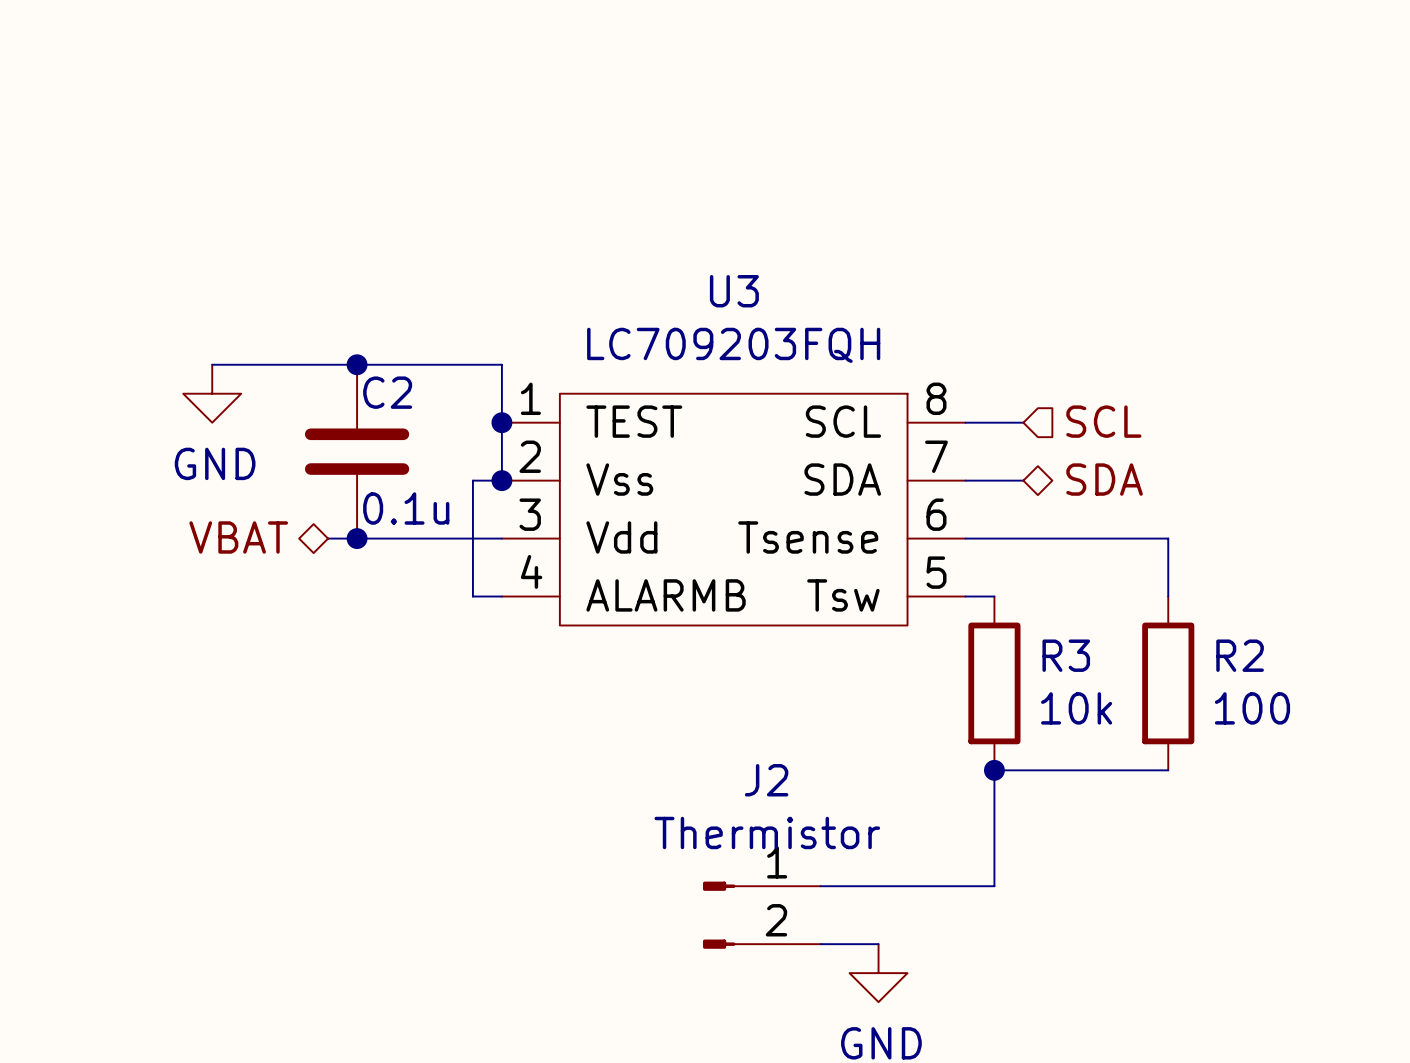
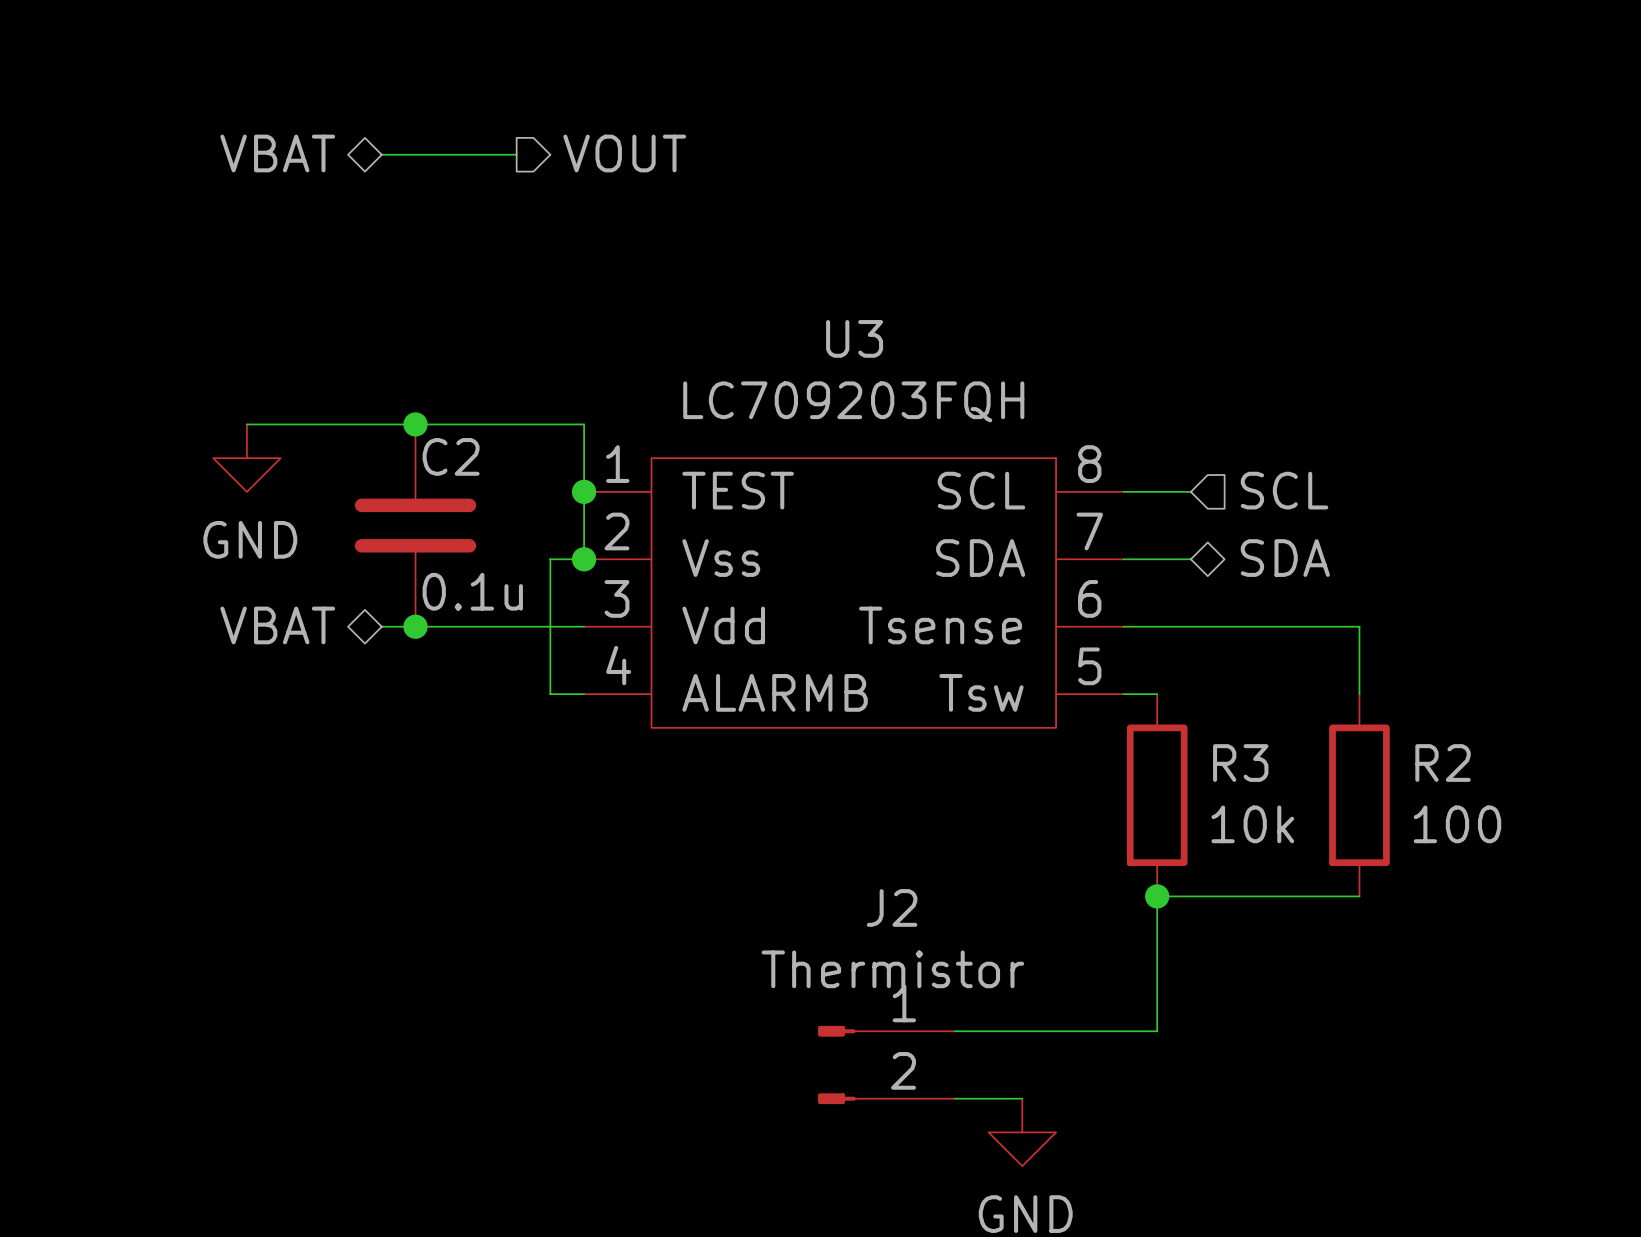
hierarchical label: none -> VBAT (277, 153)
hierarchical label: none -> VOUT (624, 153)
wire: none -> (381, 154) (516, 154)

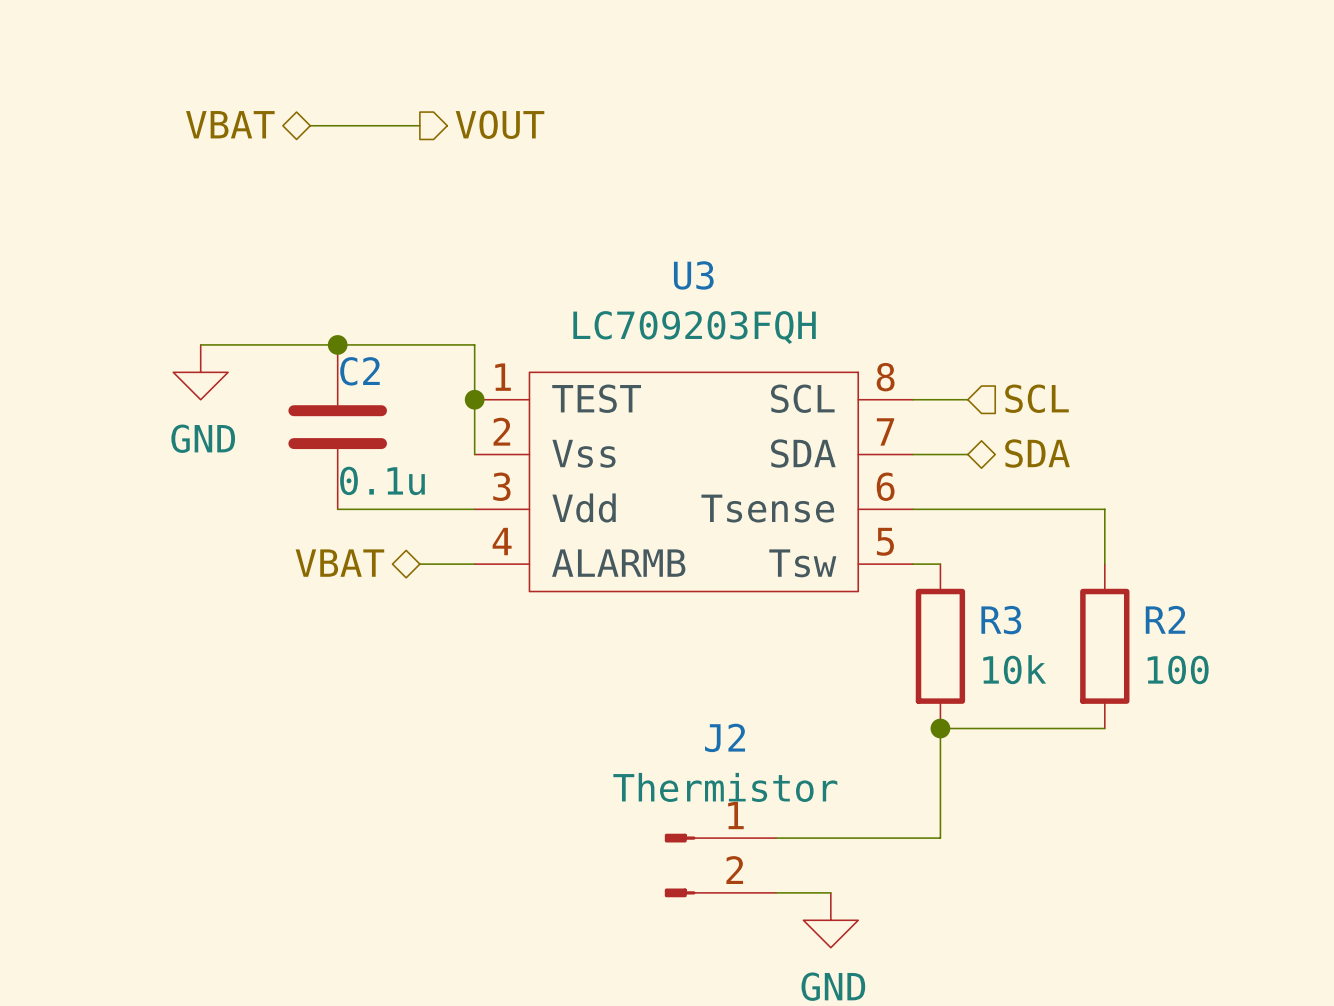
wire: (584, 559) (550, 559) (550, 694) -> (419, 564) (447, 564)
junction: (584, 559) -> none
hierarchical label position: VBAT (277, 625) -> VBAT (339, 563)
wire: (381, 626) (415, 626) -> none
junction: (415, 626) -> none

